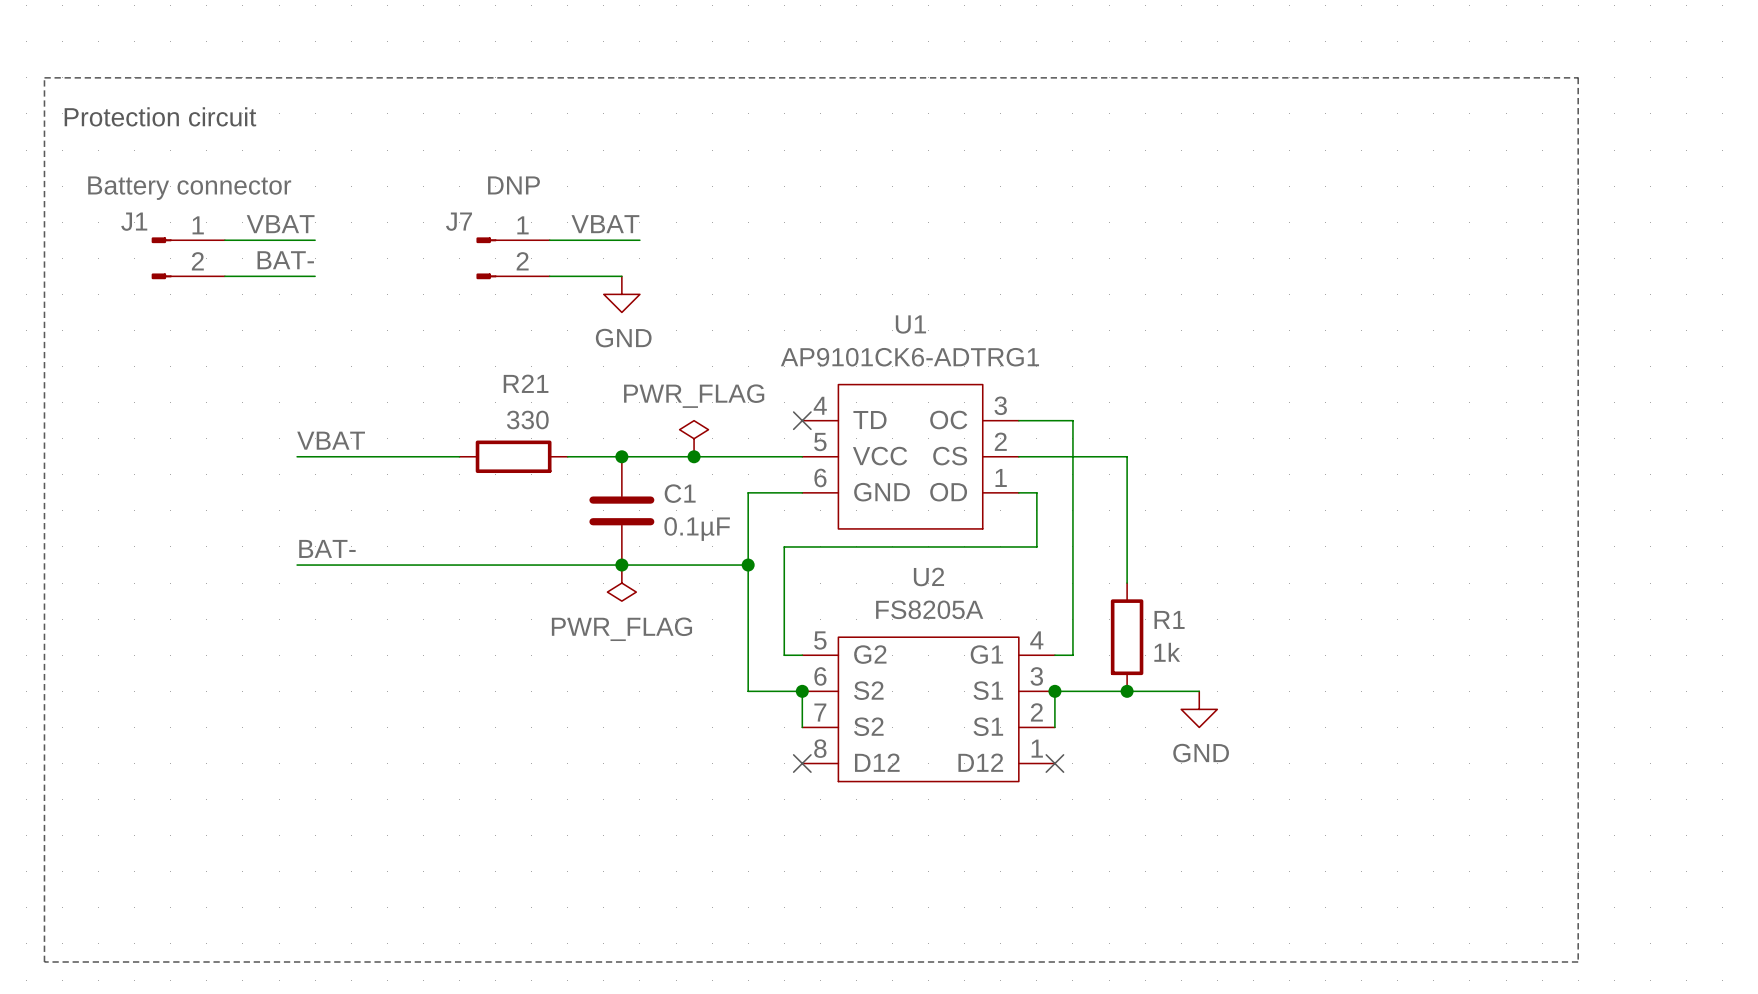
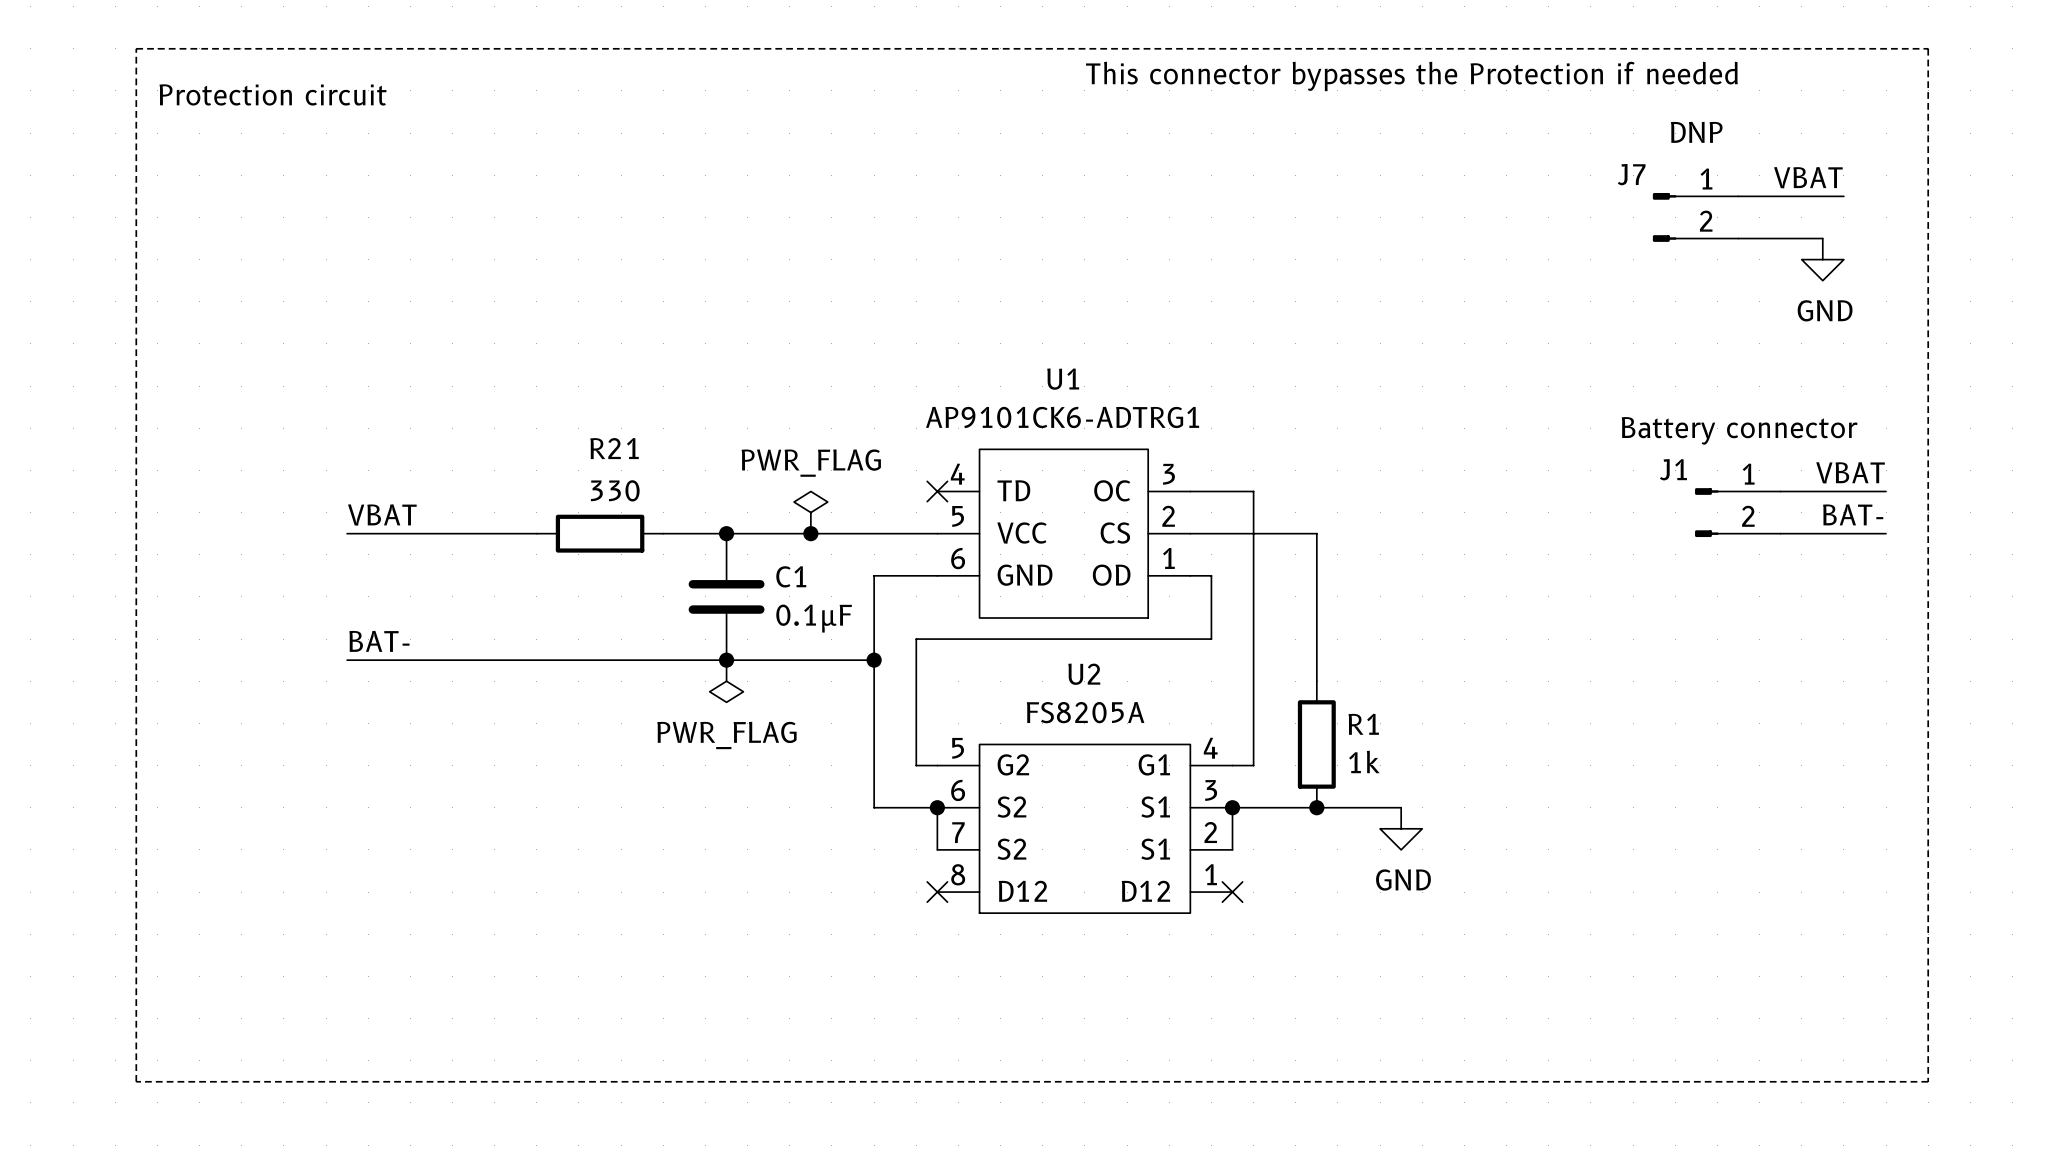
text: none -> This connector bypasses the Protection if needed (1411, 76)
line: (44, 77) (44, 961) (1578, 961) (1578, 77) (44, 77) -> (136, 48) (136, 1081) (1928, 1081) (1928, 48) (136, 48)
text position: Protection circuit (160, 116) -> Protection circuit (273, 94)
label: none -> VBAT (1808, 177)
wire: none -> (1738, 196) (1843, 196)
wire: none -> (1738, 238) (1822, 238)
power symbol: none -> GND (1822, 259)
label: VBAT (280, 224) -> none
label: VBAT (605, 224) -> none
wire: (224, 240) (315, 240) -> none
wire: (549, 240) (639, 240) -> none
J1 position: (188, 258) -> (1737, 512)
J7 position: (513, 258) -> (1695, 217)
label: BAT- (285, 260) -> none
wire: (224, 276) (315, 276) -> none
wire: (549, 276) (621, 276) -> none
power symbol: GND (621, 294) -> none
label: none -> VBAT (1850, 472)
wire: none -> (1780, 491) (1886, 491)
label: none -> BAT- (1853, 514)
wire: none -> (1780, 533) (1886, 533)

